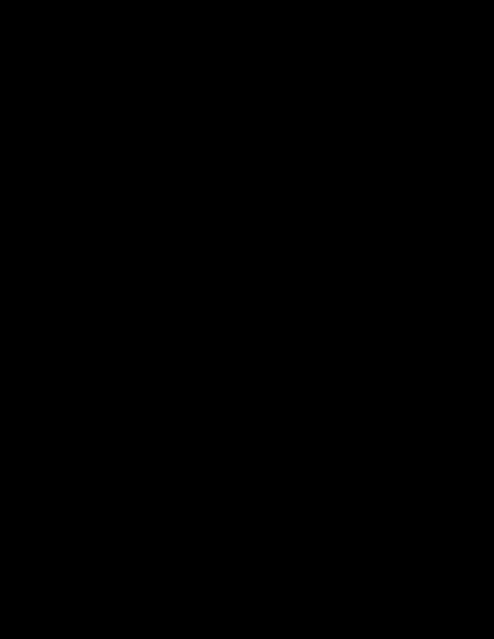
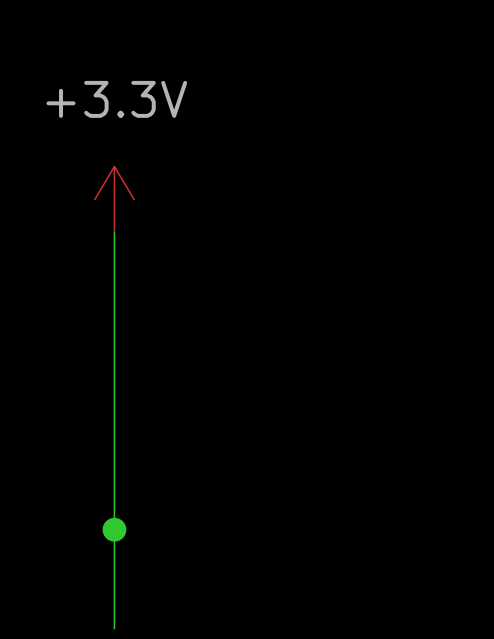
power symbol: none -> +3.3V (114, 199)
wire: none -> (114, 232) (114, 628)
junction: none -> (114, 529)

